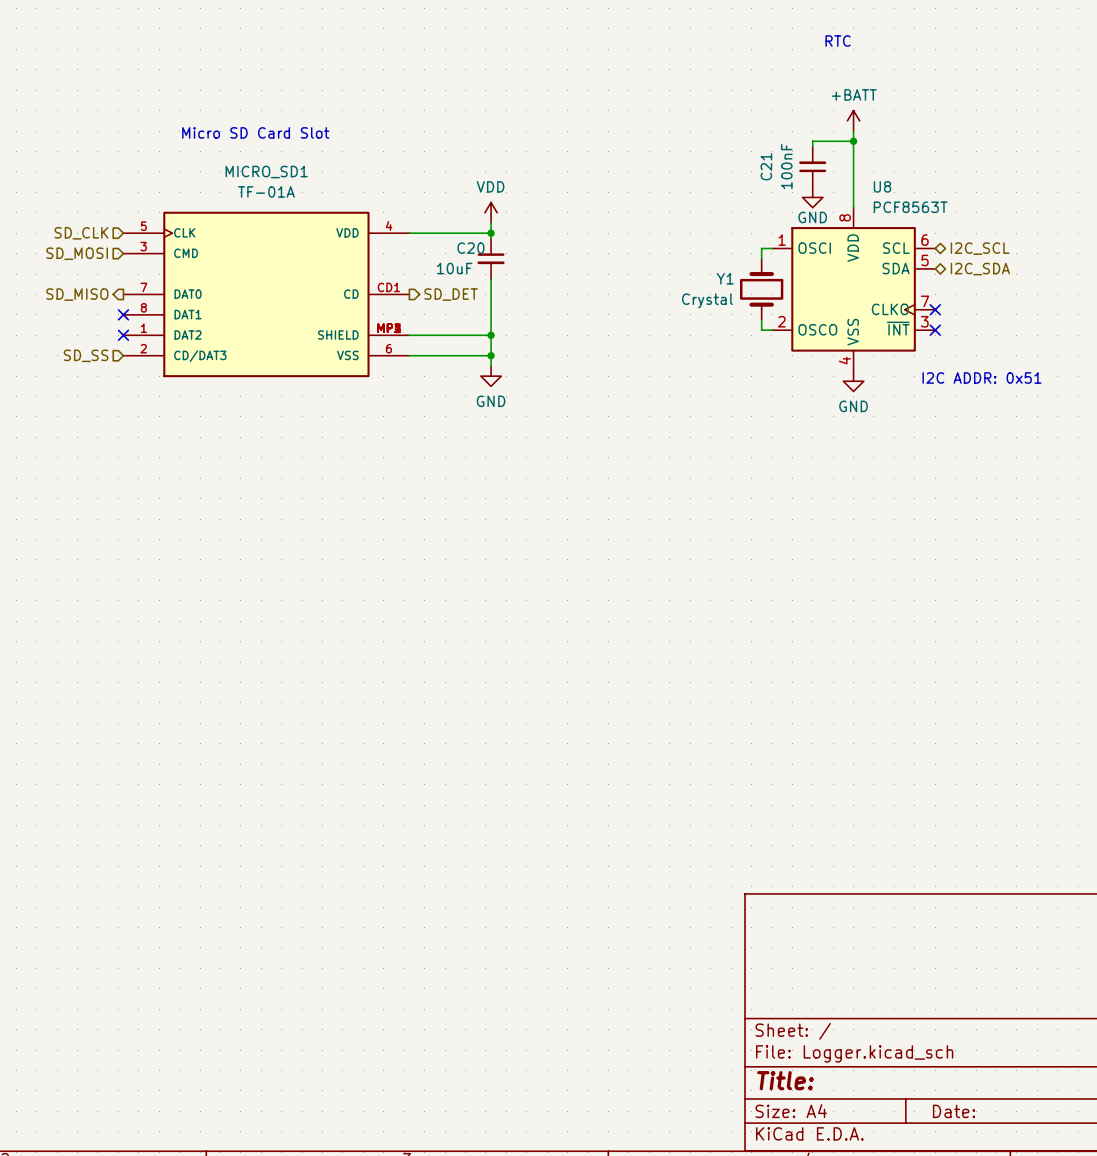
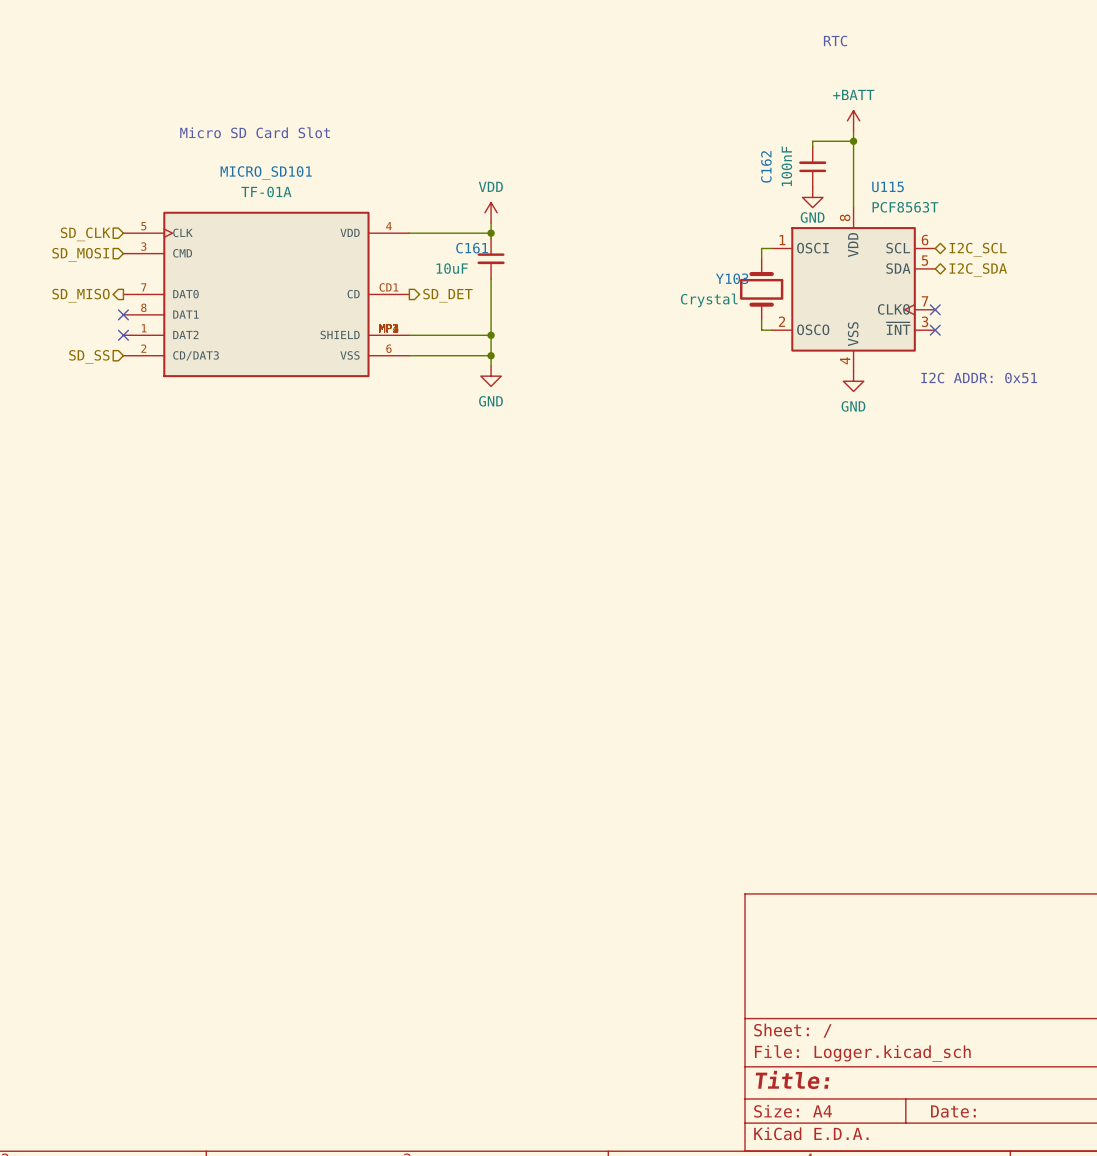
C21 name: C21 (766, 166) -> C162 (766, 166)
MICRO_SD1 name: MICRO_SD1 (266, 172) -> MICRO_SD101 (266, 173)
U8 name: U8 (882, 186) -> U115 (888, 186)
C20 name: C20 (470, 248) -> C161 (472, 248)
Y1 name: Y1 (725, 278) -> Y103 (732, 278)

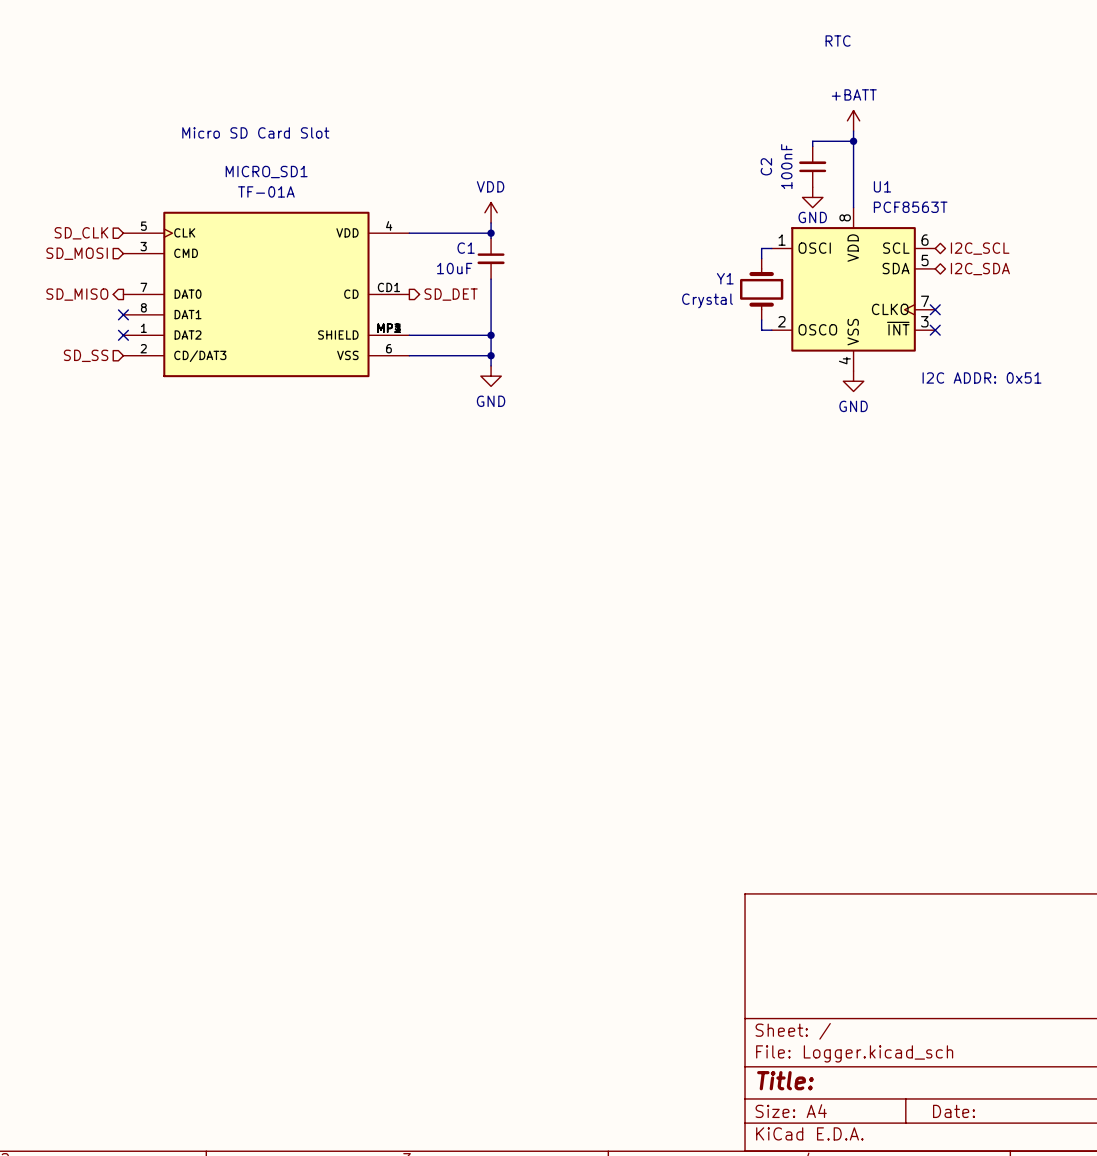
C162 name: C162 (766, 166) -> C2 (766, 166)
MICRO_SD101 name: MICRO_SD101 (266, 173) -> MICRO_SD1 (266, 172)
U115 name: U115 (888, 186) -> U1 (882, 186)
C161 name: C161 (472, 248) -> C1 (466, 248)
Y103 name: Y103 (732, 278) -> Y1 (725, 278)

